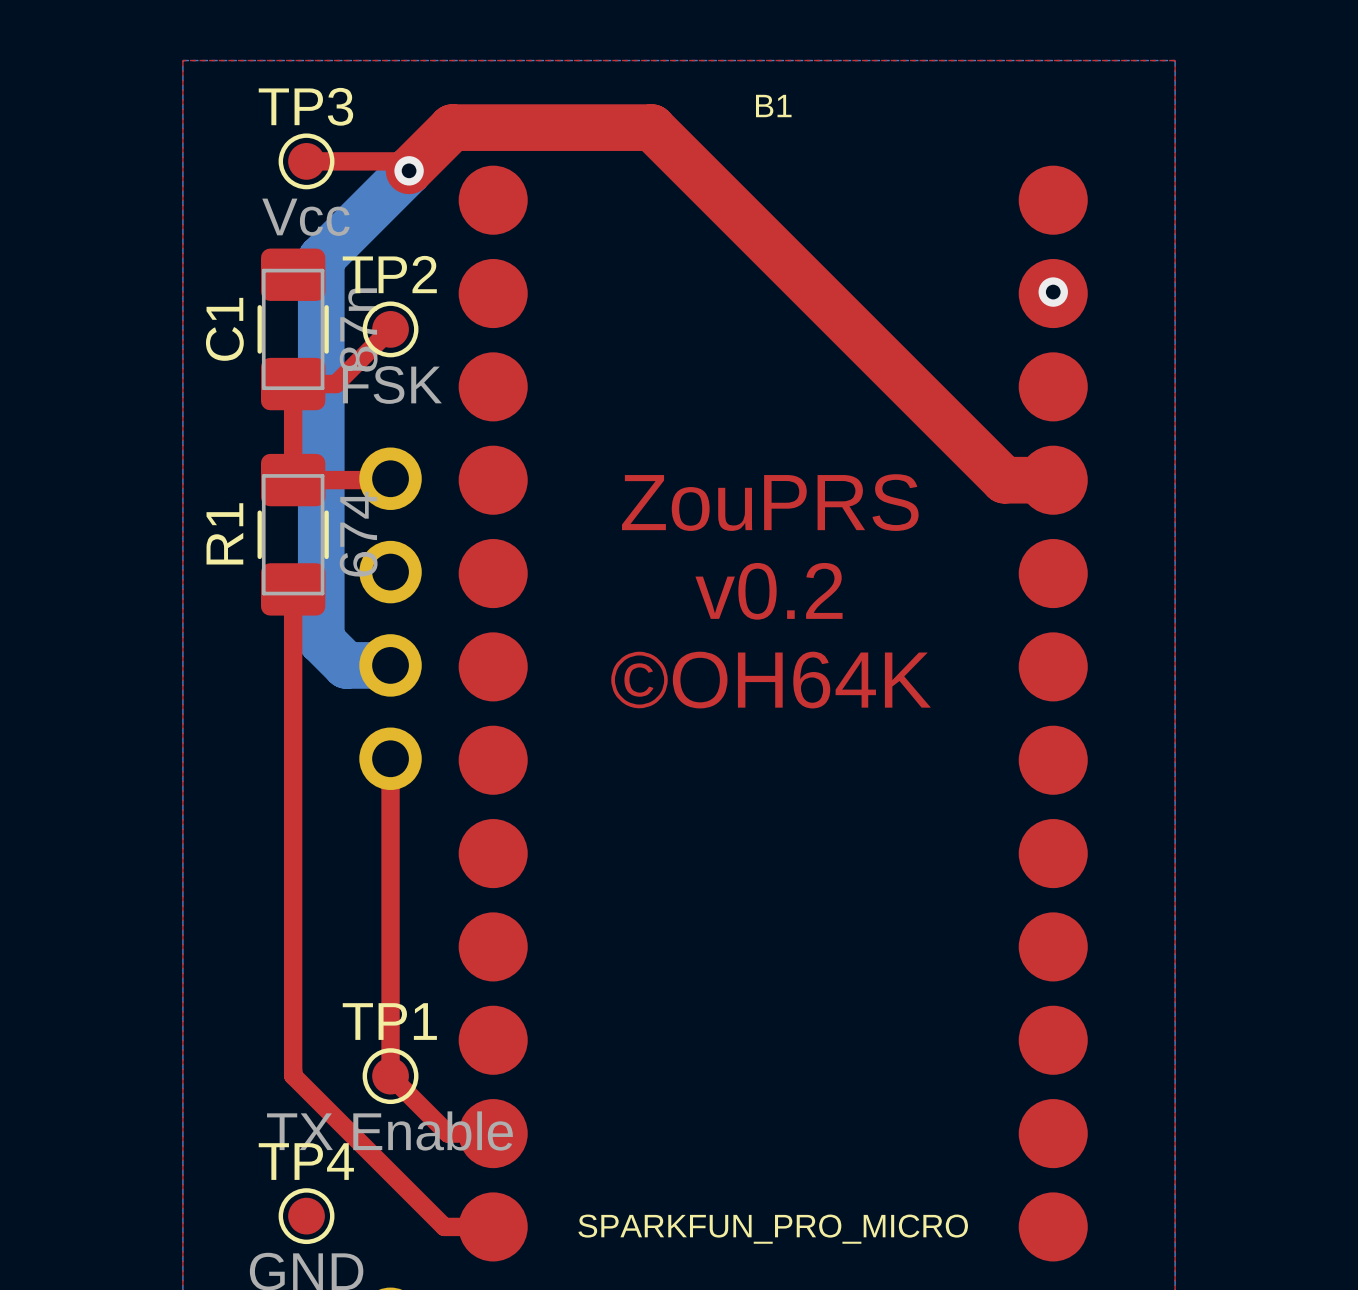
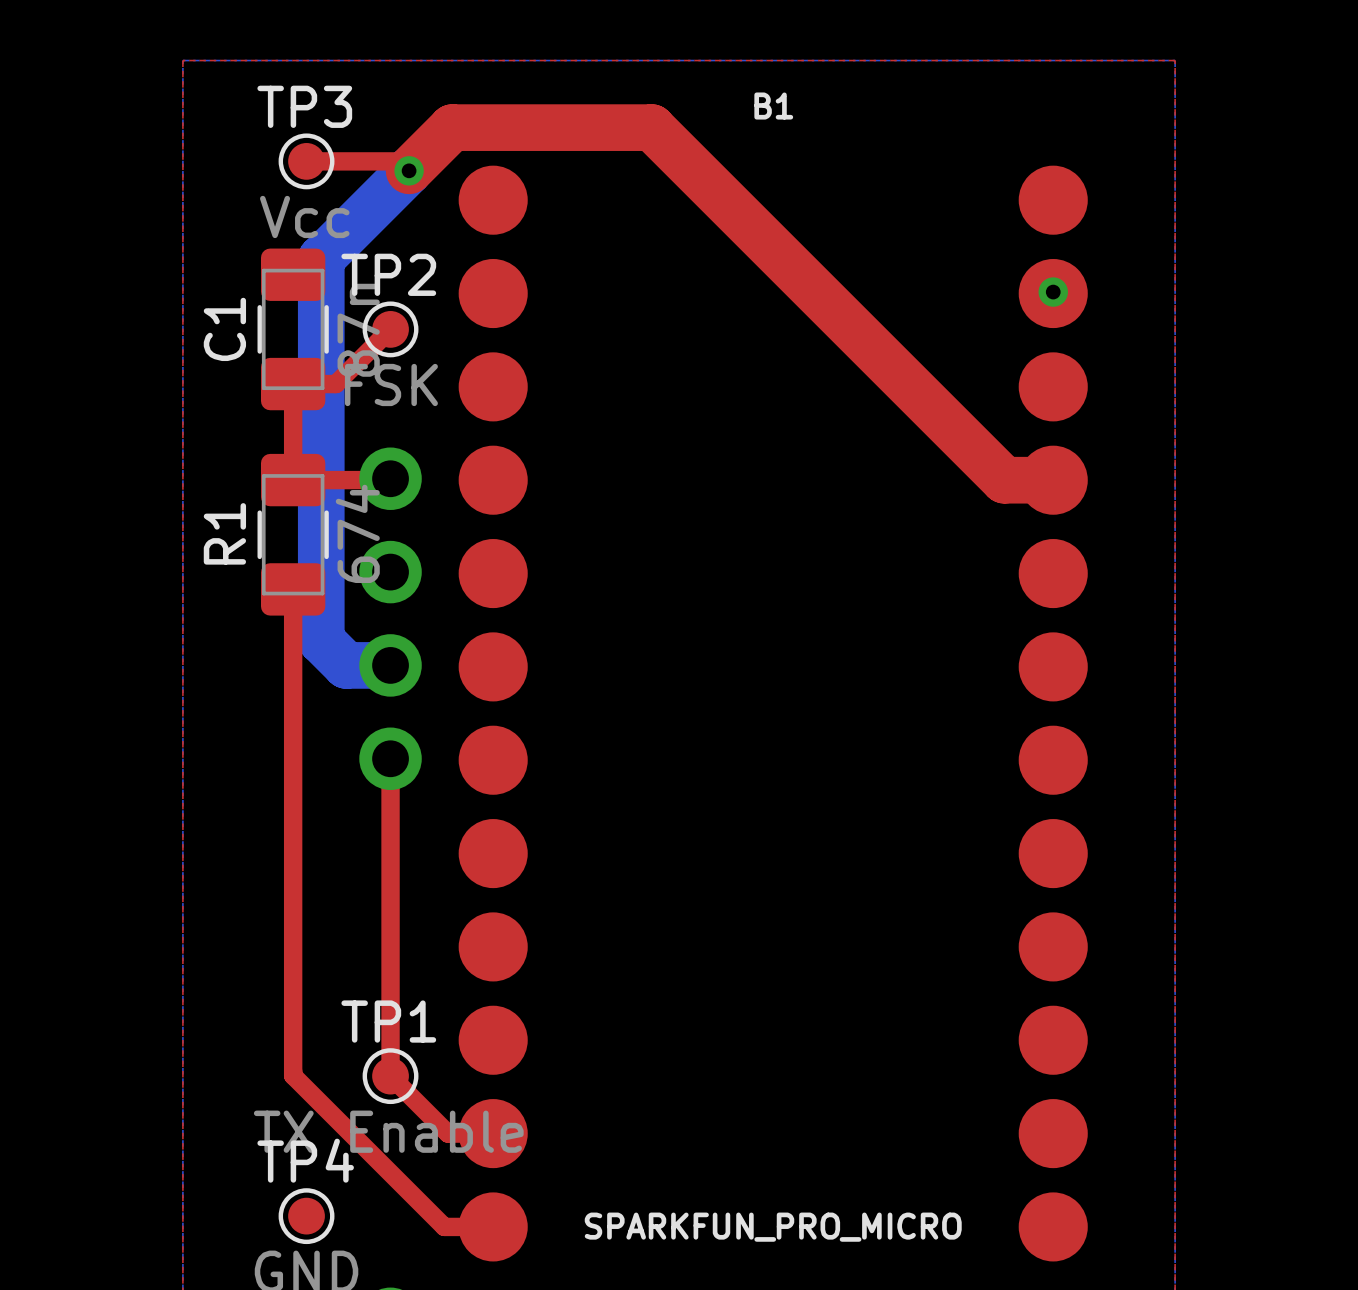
text: ZouPRS (770, 502) -> none
text: v0.2 (769, 591) -> none
text: ©OH64K (771, 680) -> none

